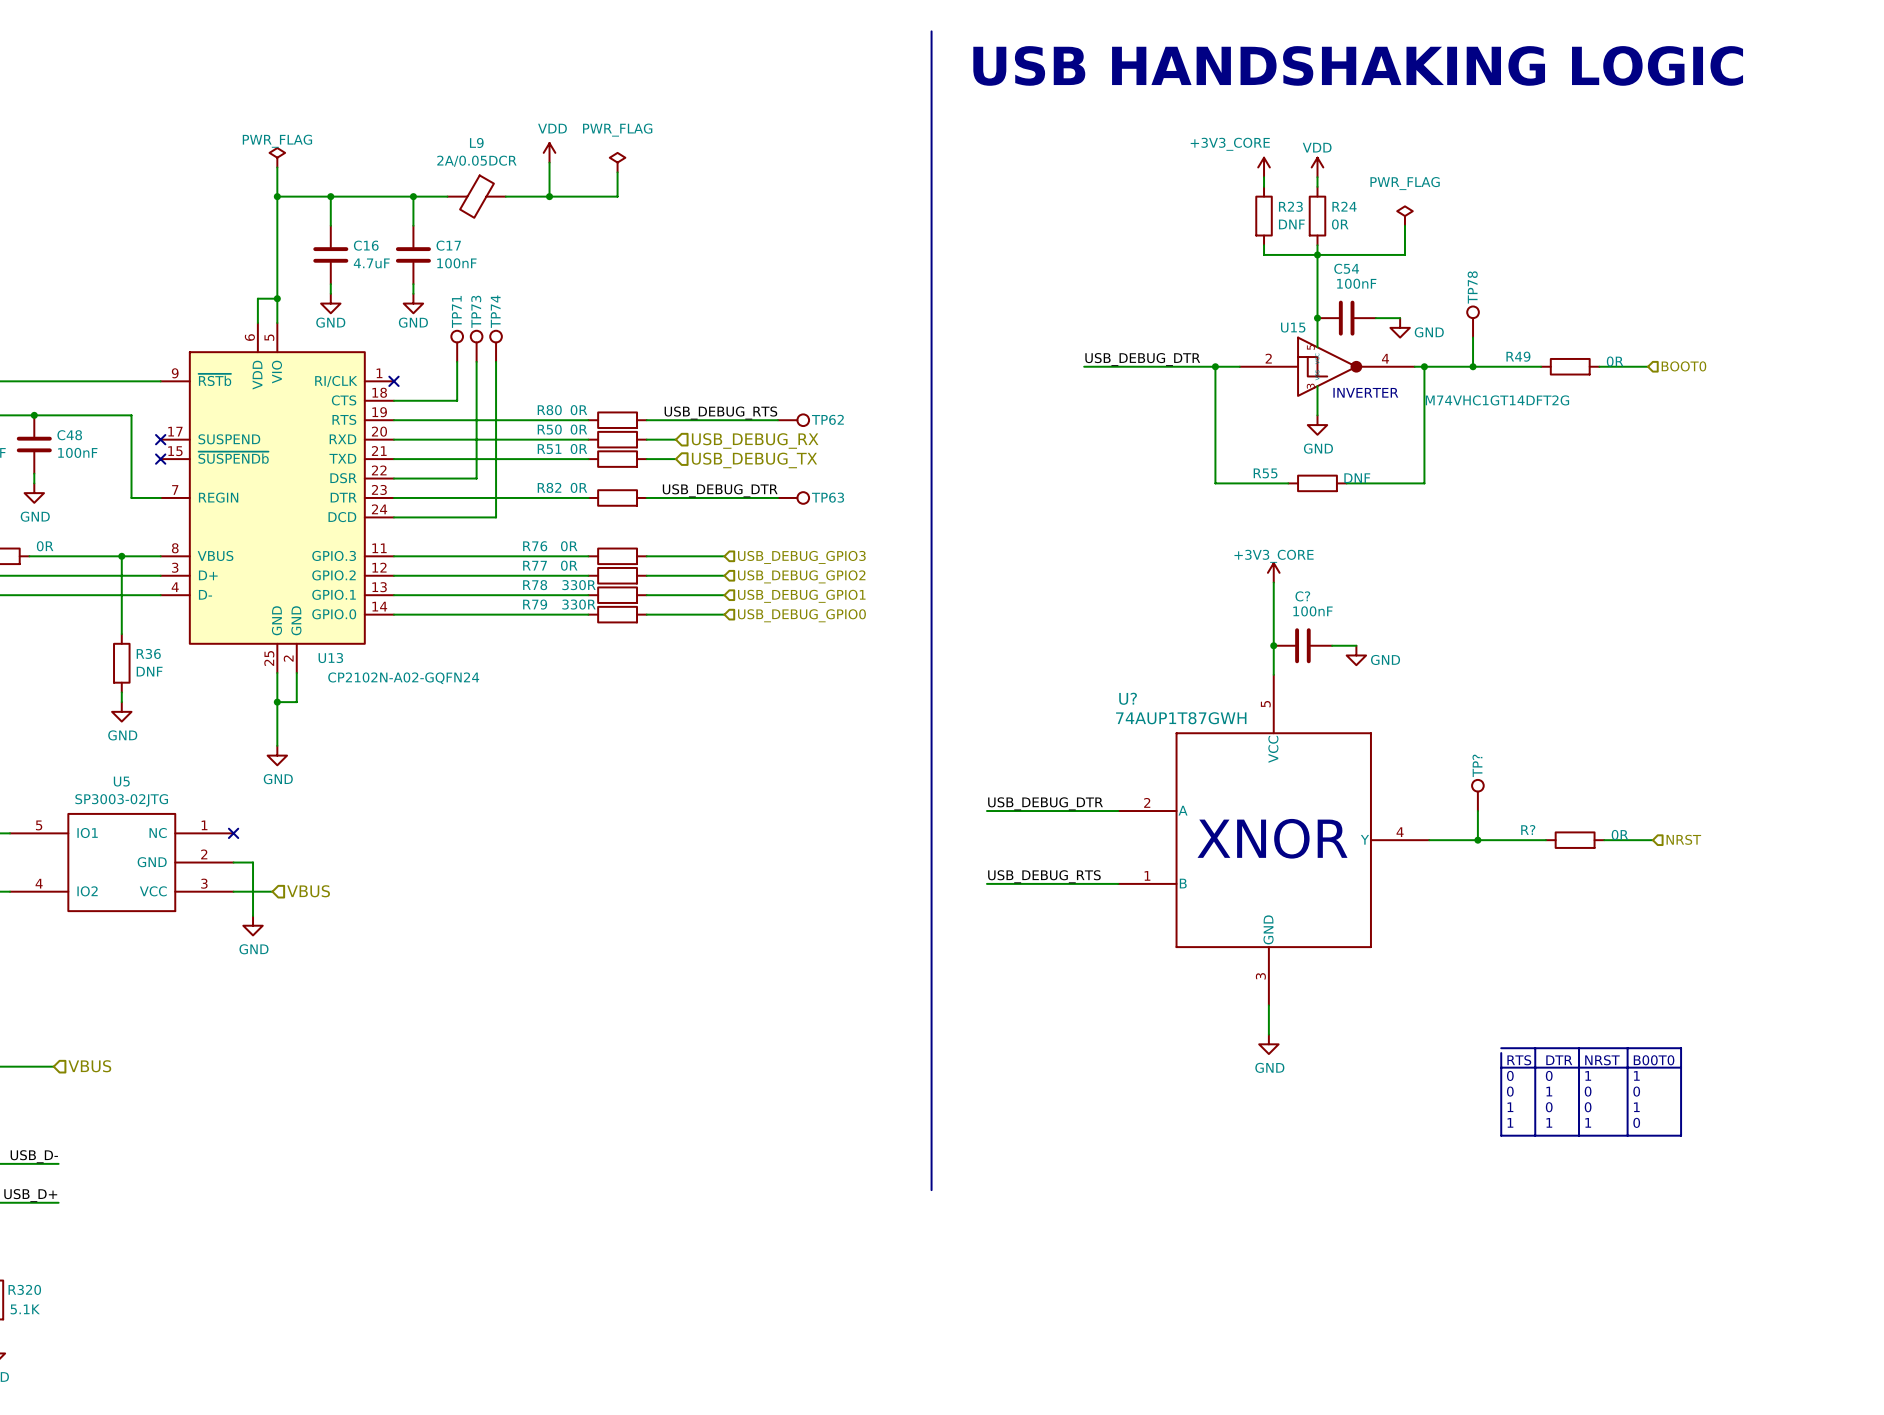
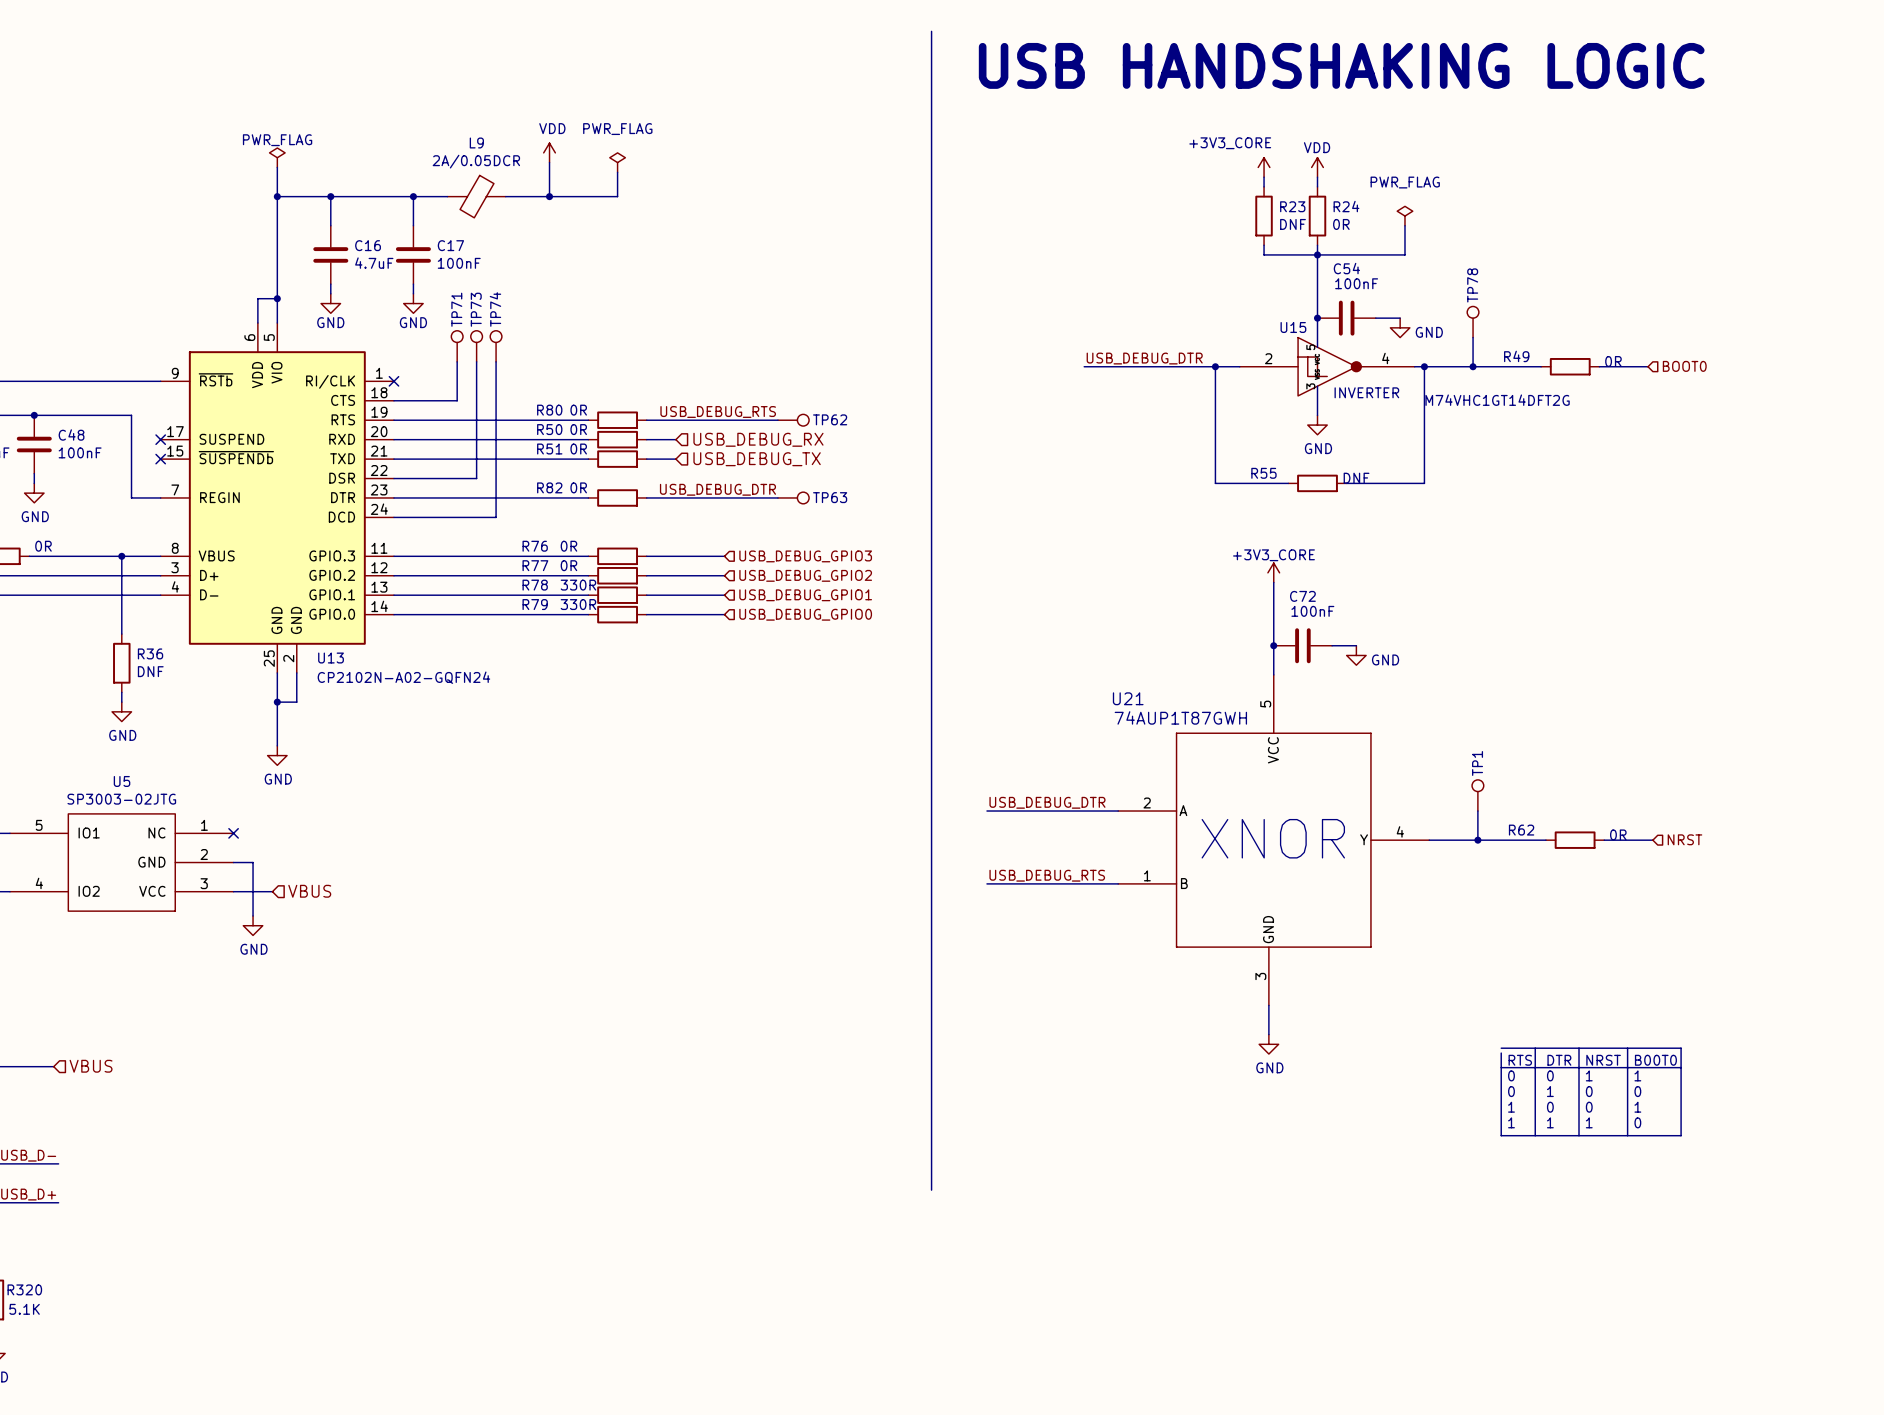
C? name: C? (1302, 596) -> C72 (1302, 596)
U? name: U? (1128, 698) -> U21 (1128, 698)
TP? name: TP? (1477, 765) -> TP1 (1477, 763)
R? name: R? (1528, 830) -> R62 (1521, 830)

